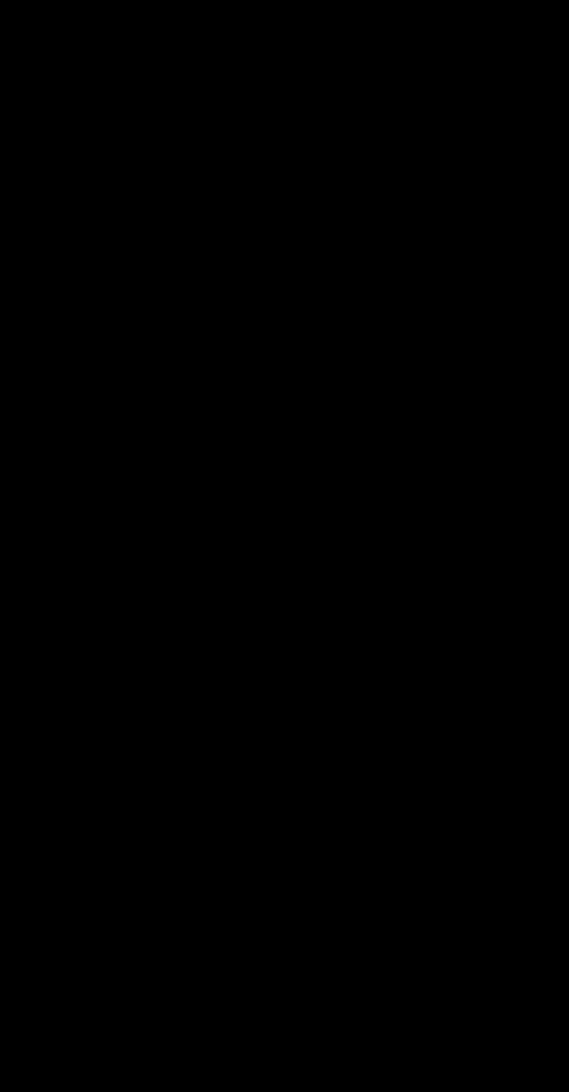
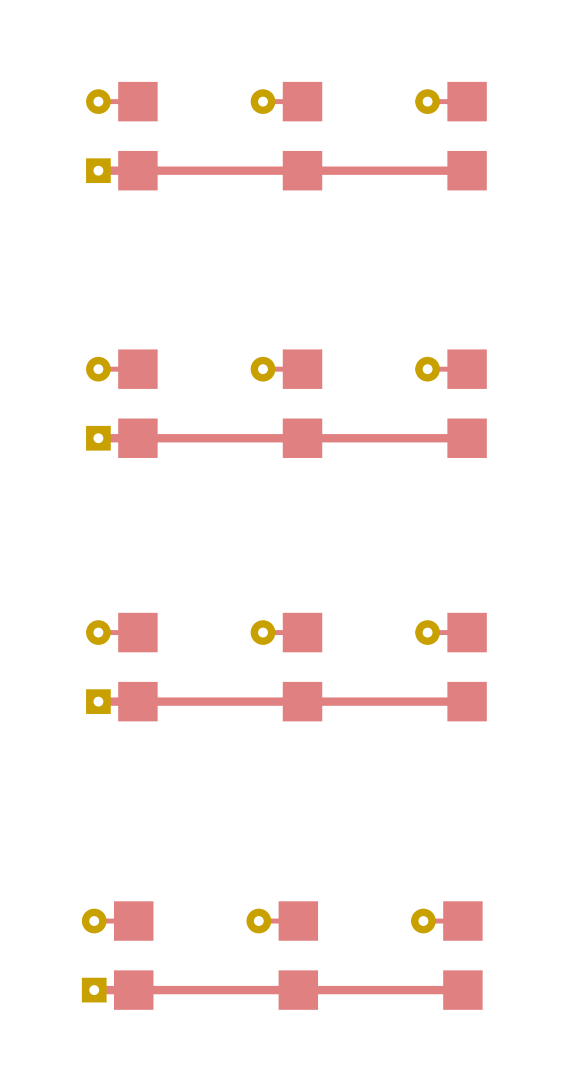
part: none -> (286, 136)
part: none -> (286, 403)
part: none -> (286, 667)
part: none -> (282, 955)

